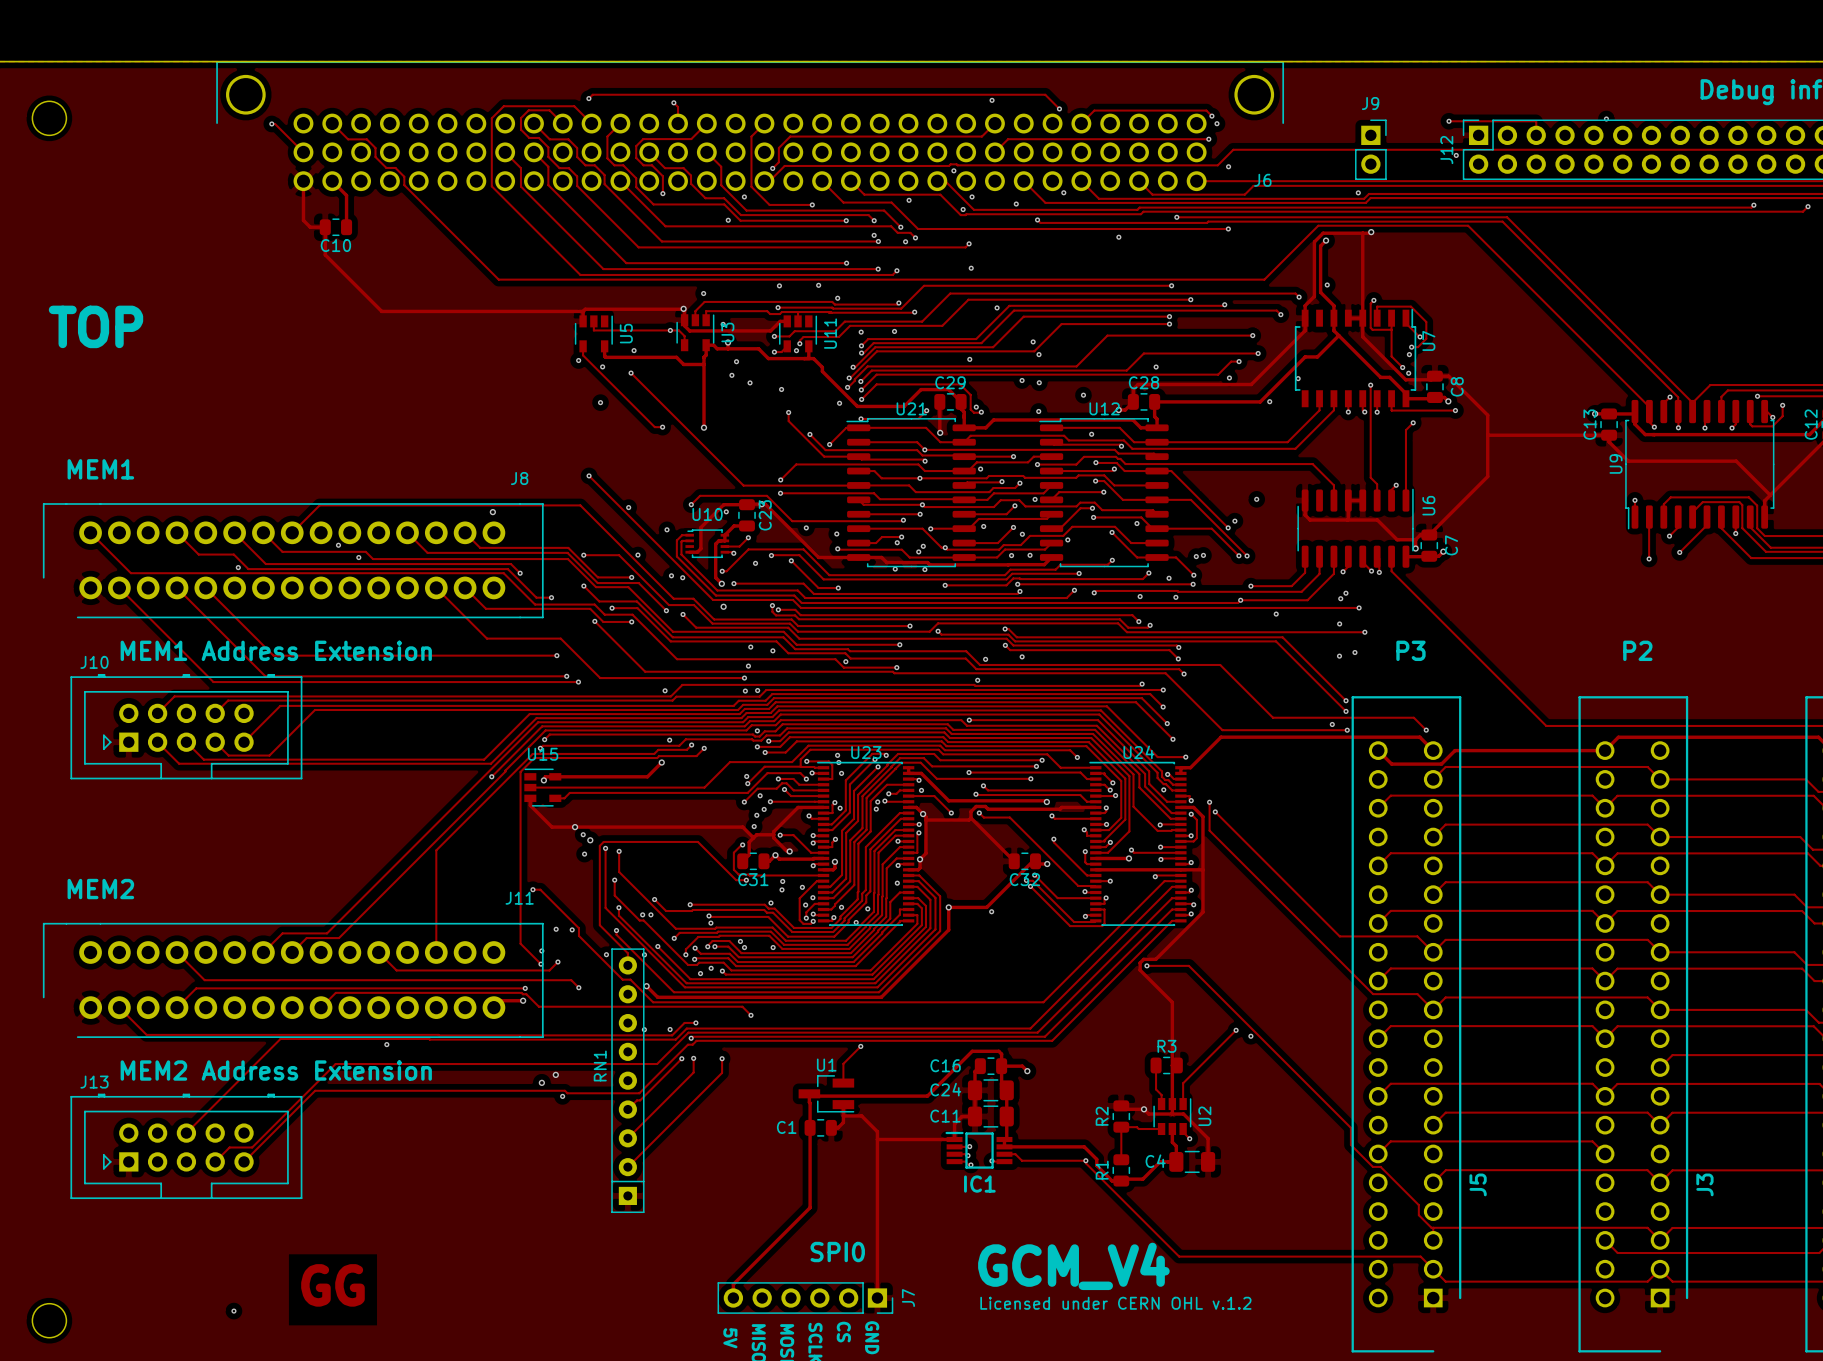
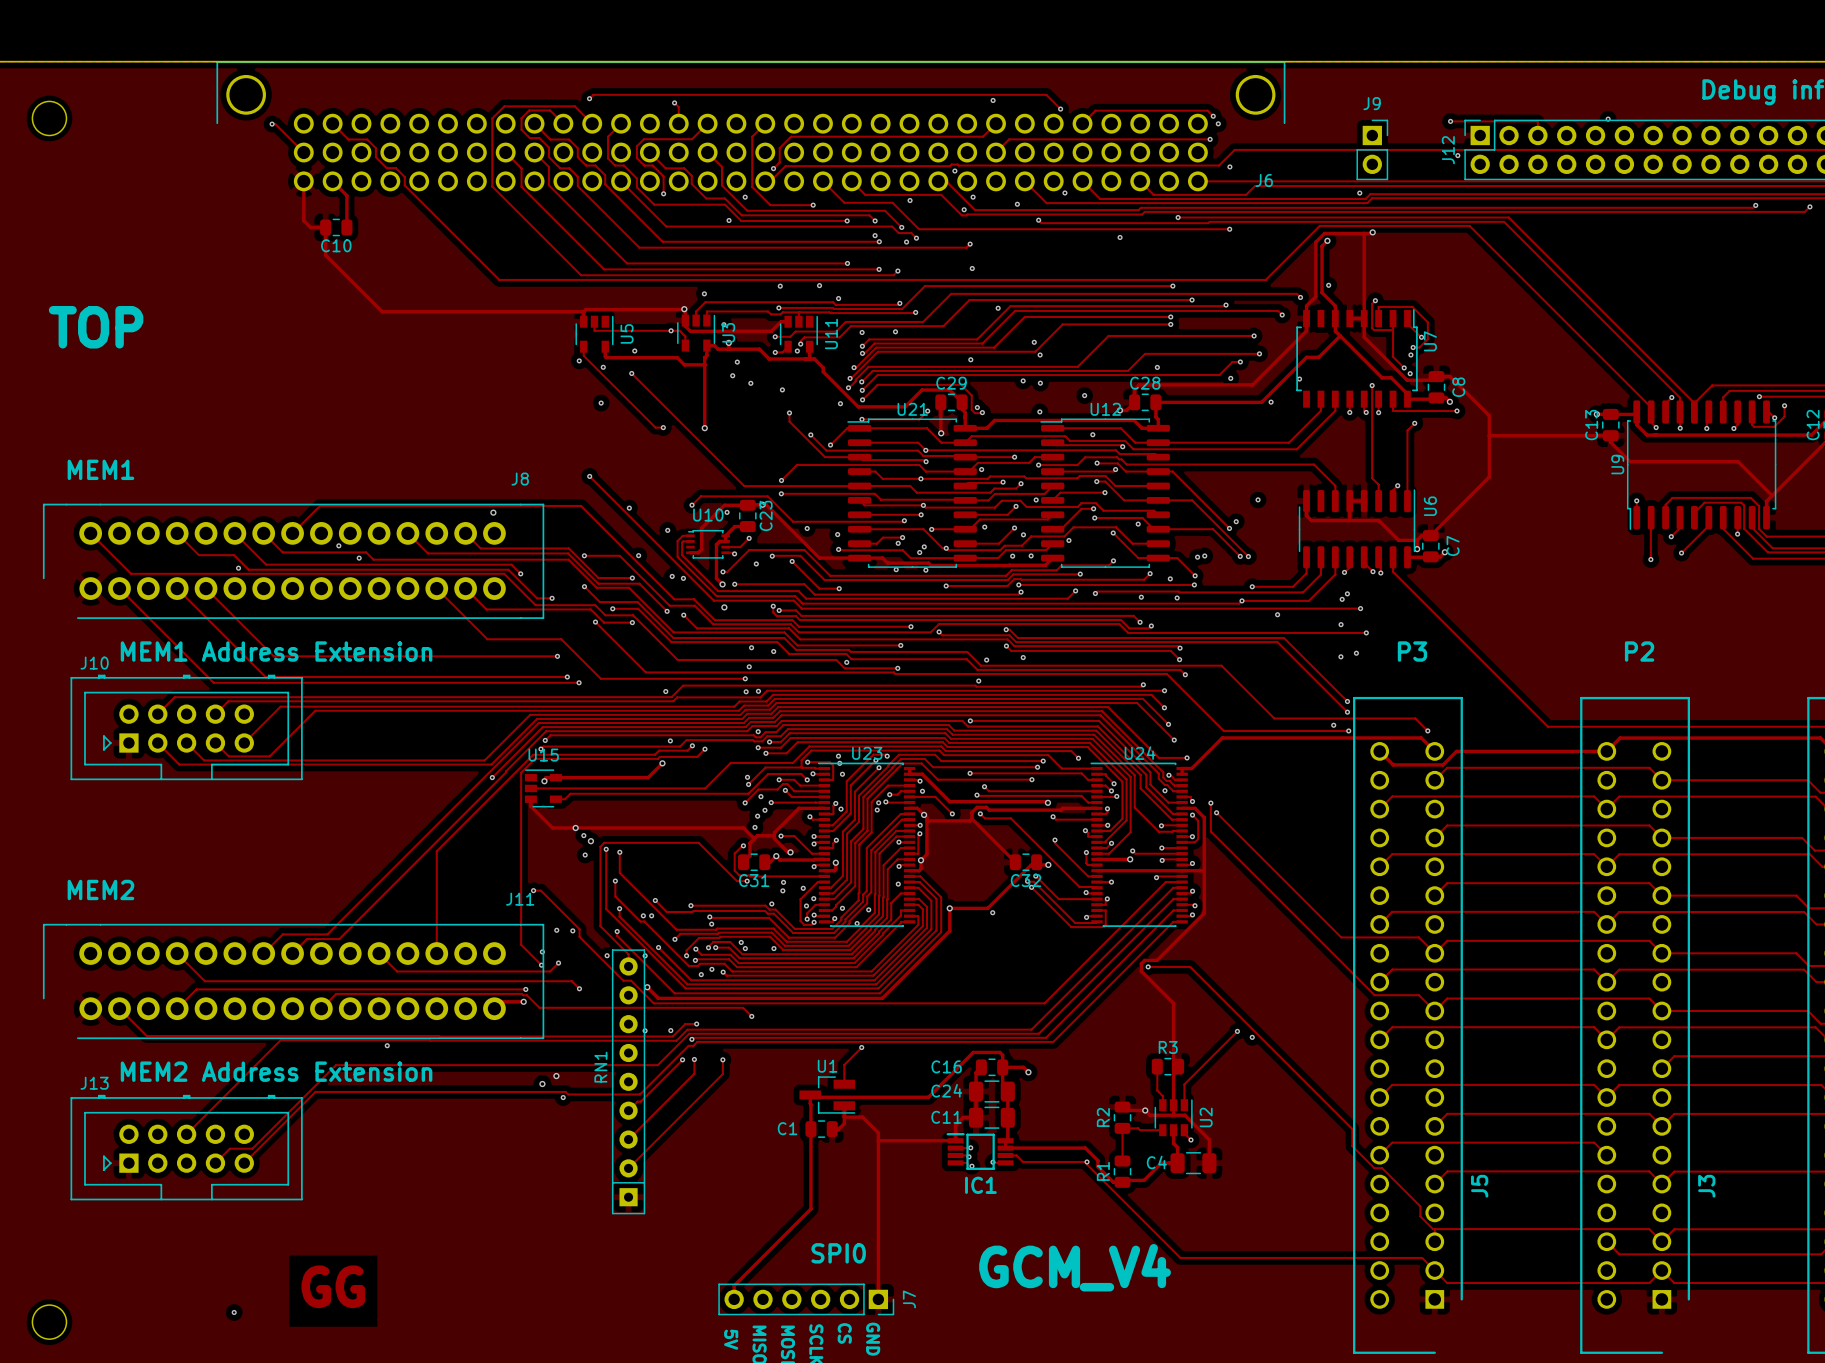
text: Licensed under CERN OHL v.1.2 (1115, 1303) -> none

